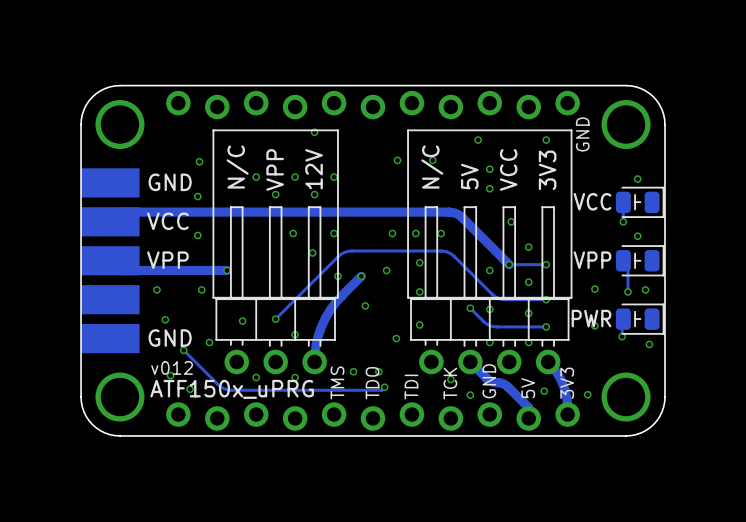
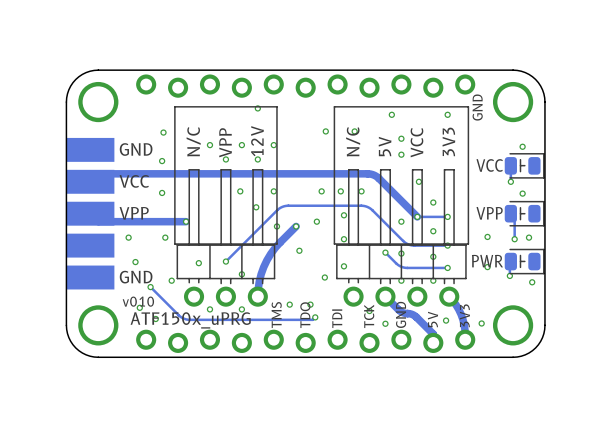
text: v012 (172, 367) -> v010 (138, 301)

